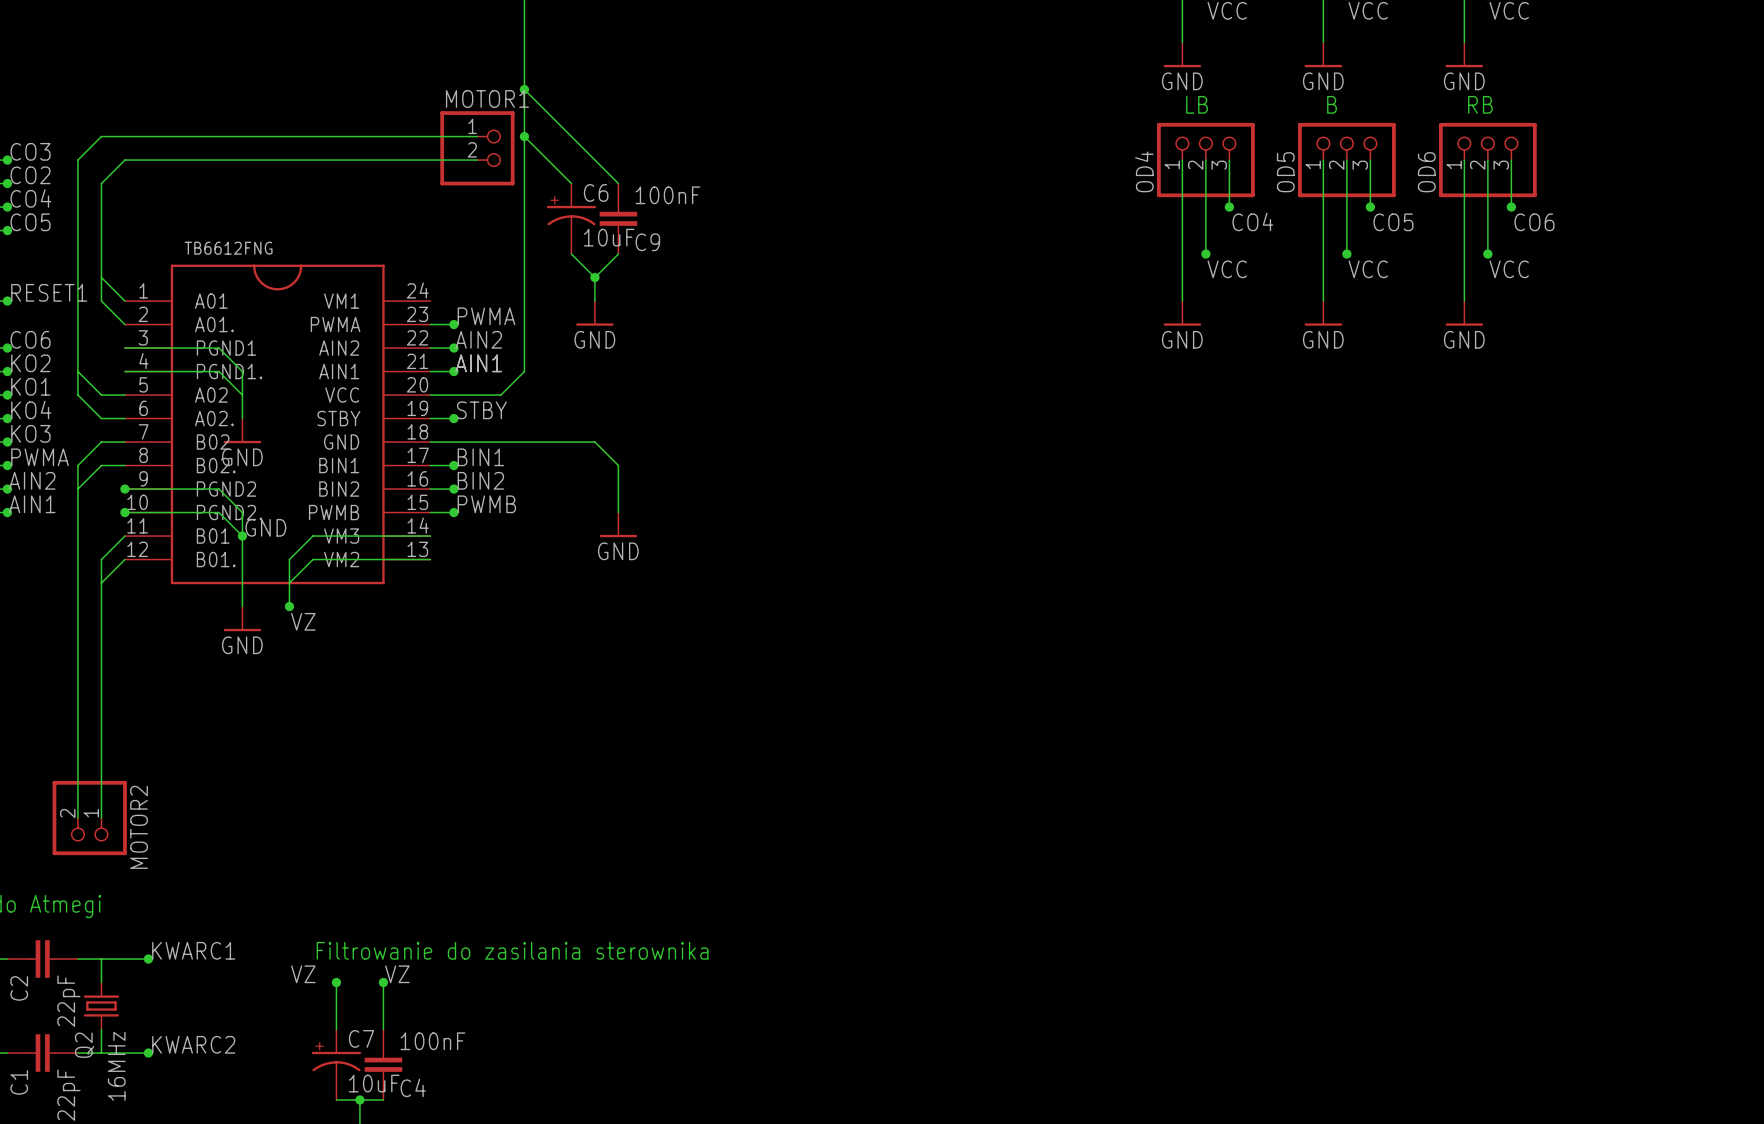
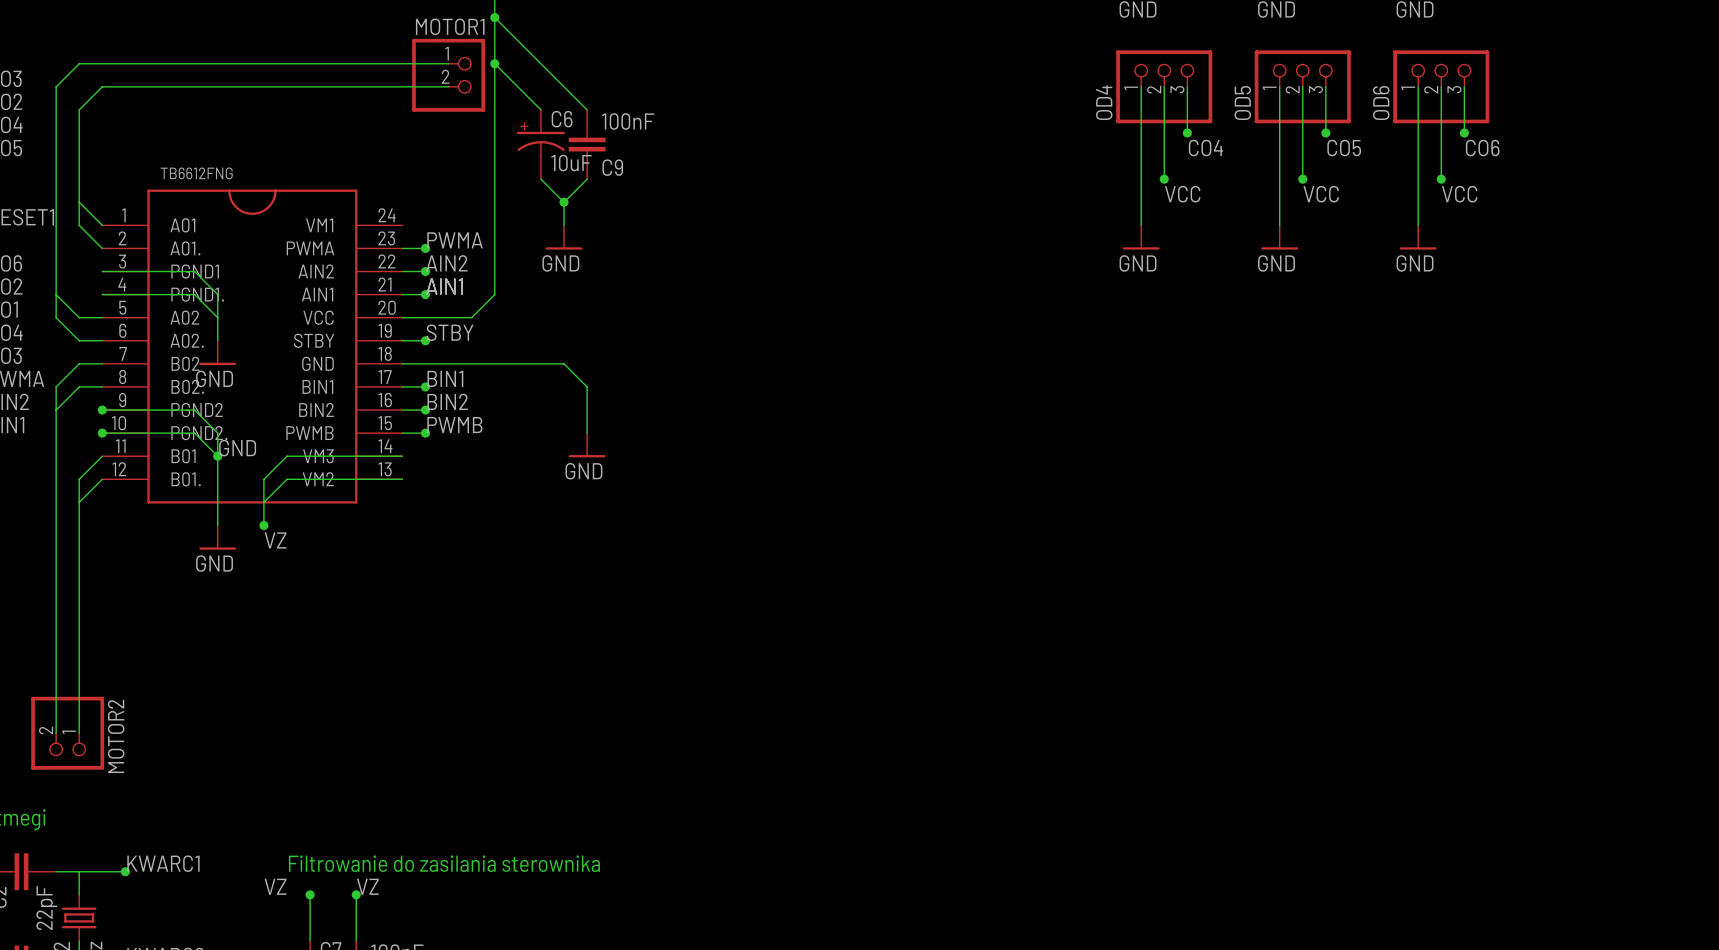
text: LB (1197, 104) -> none
text: B (1332, 104) -> none
text: RB (1480, 104) -> none

